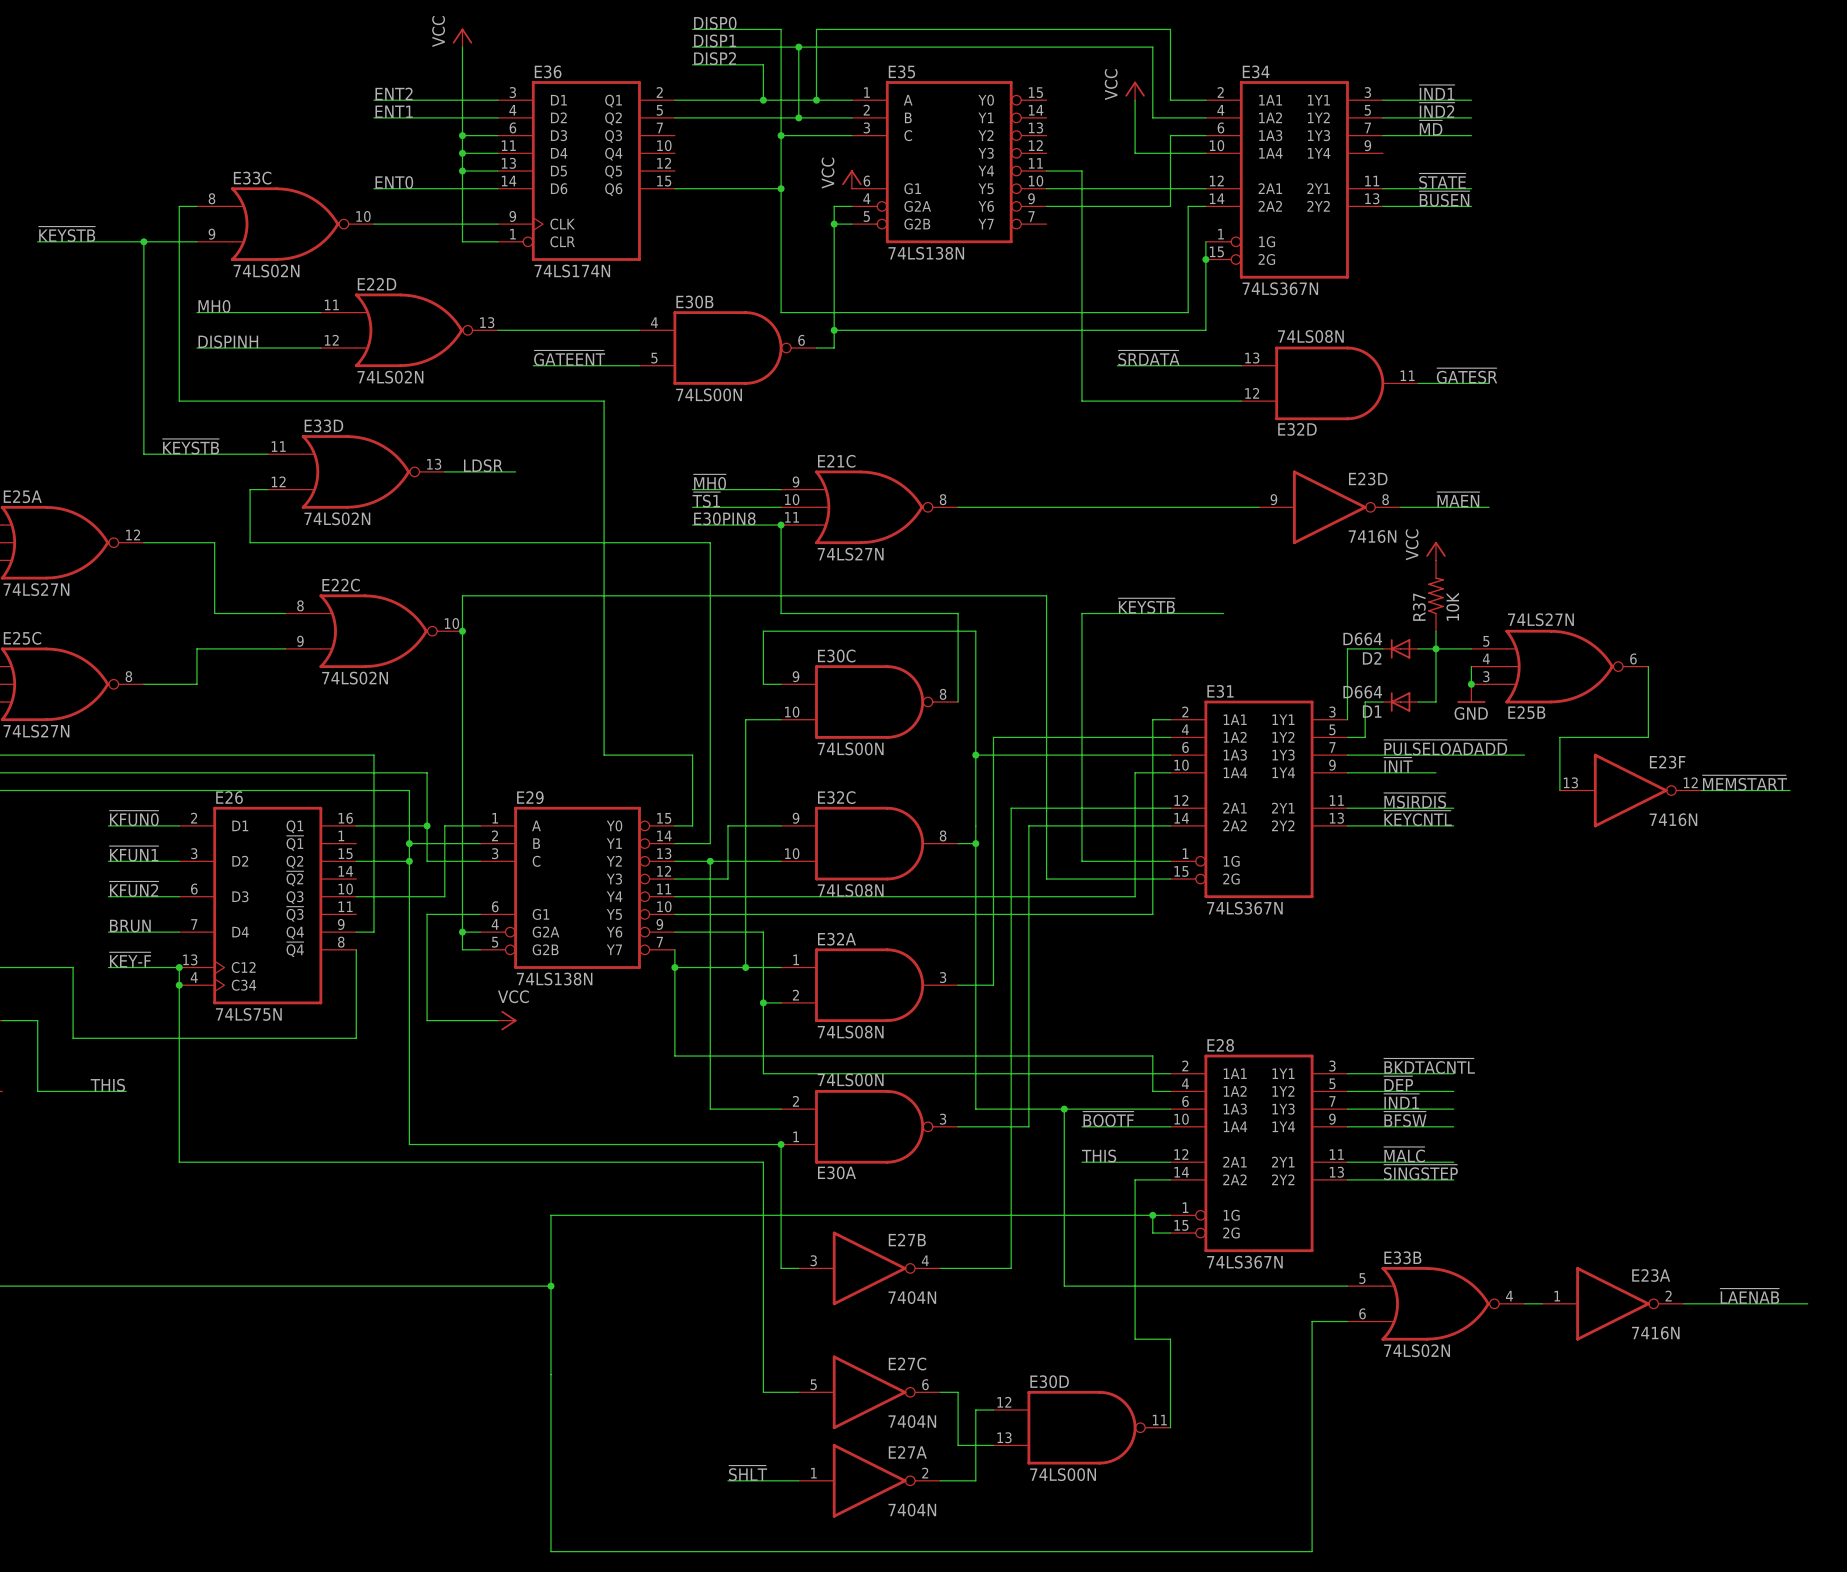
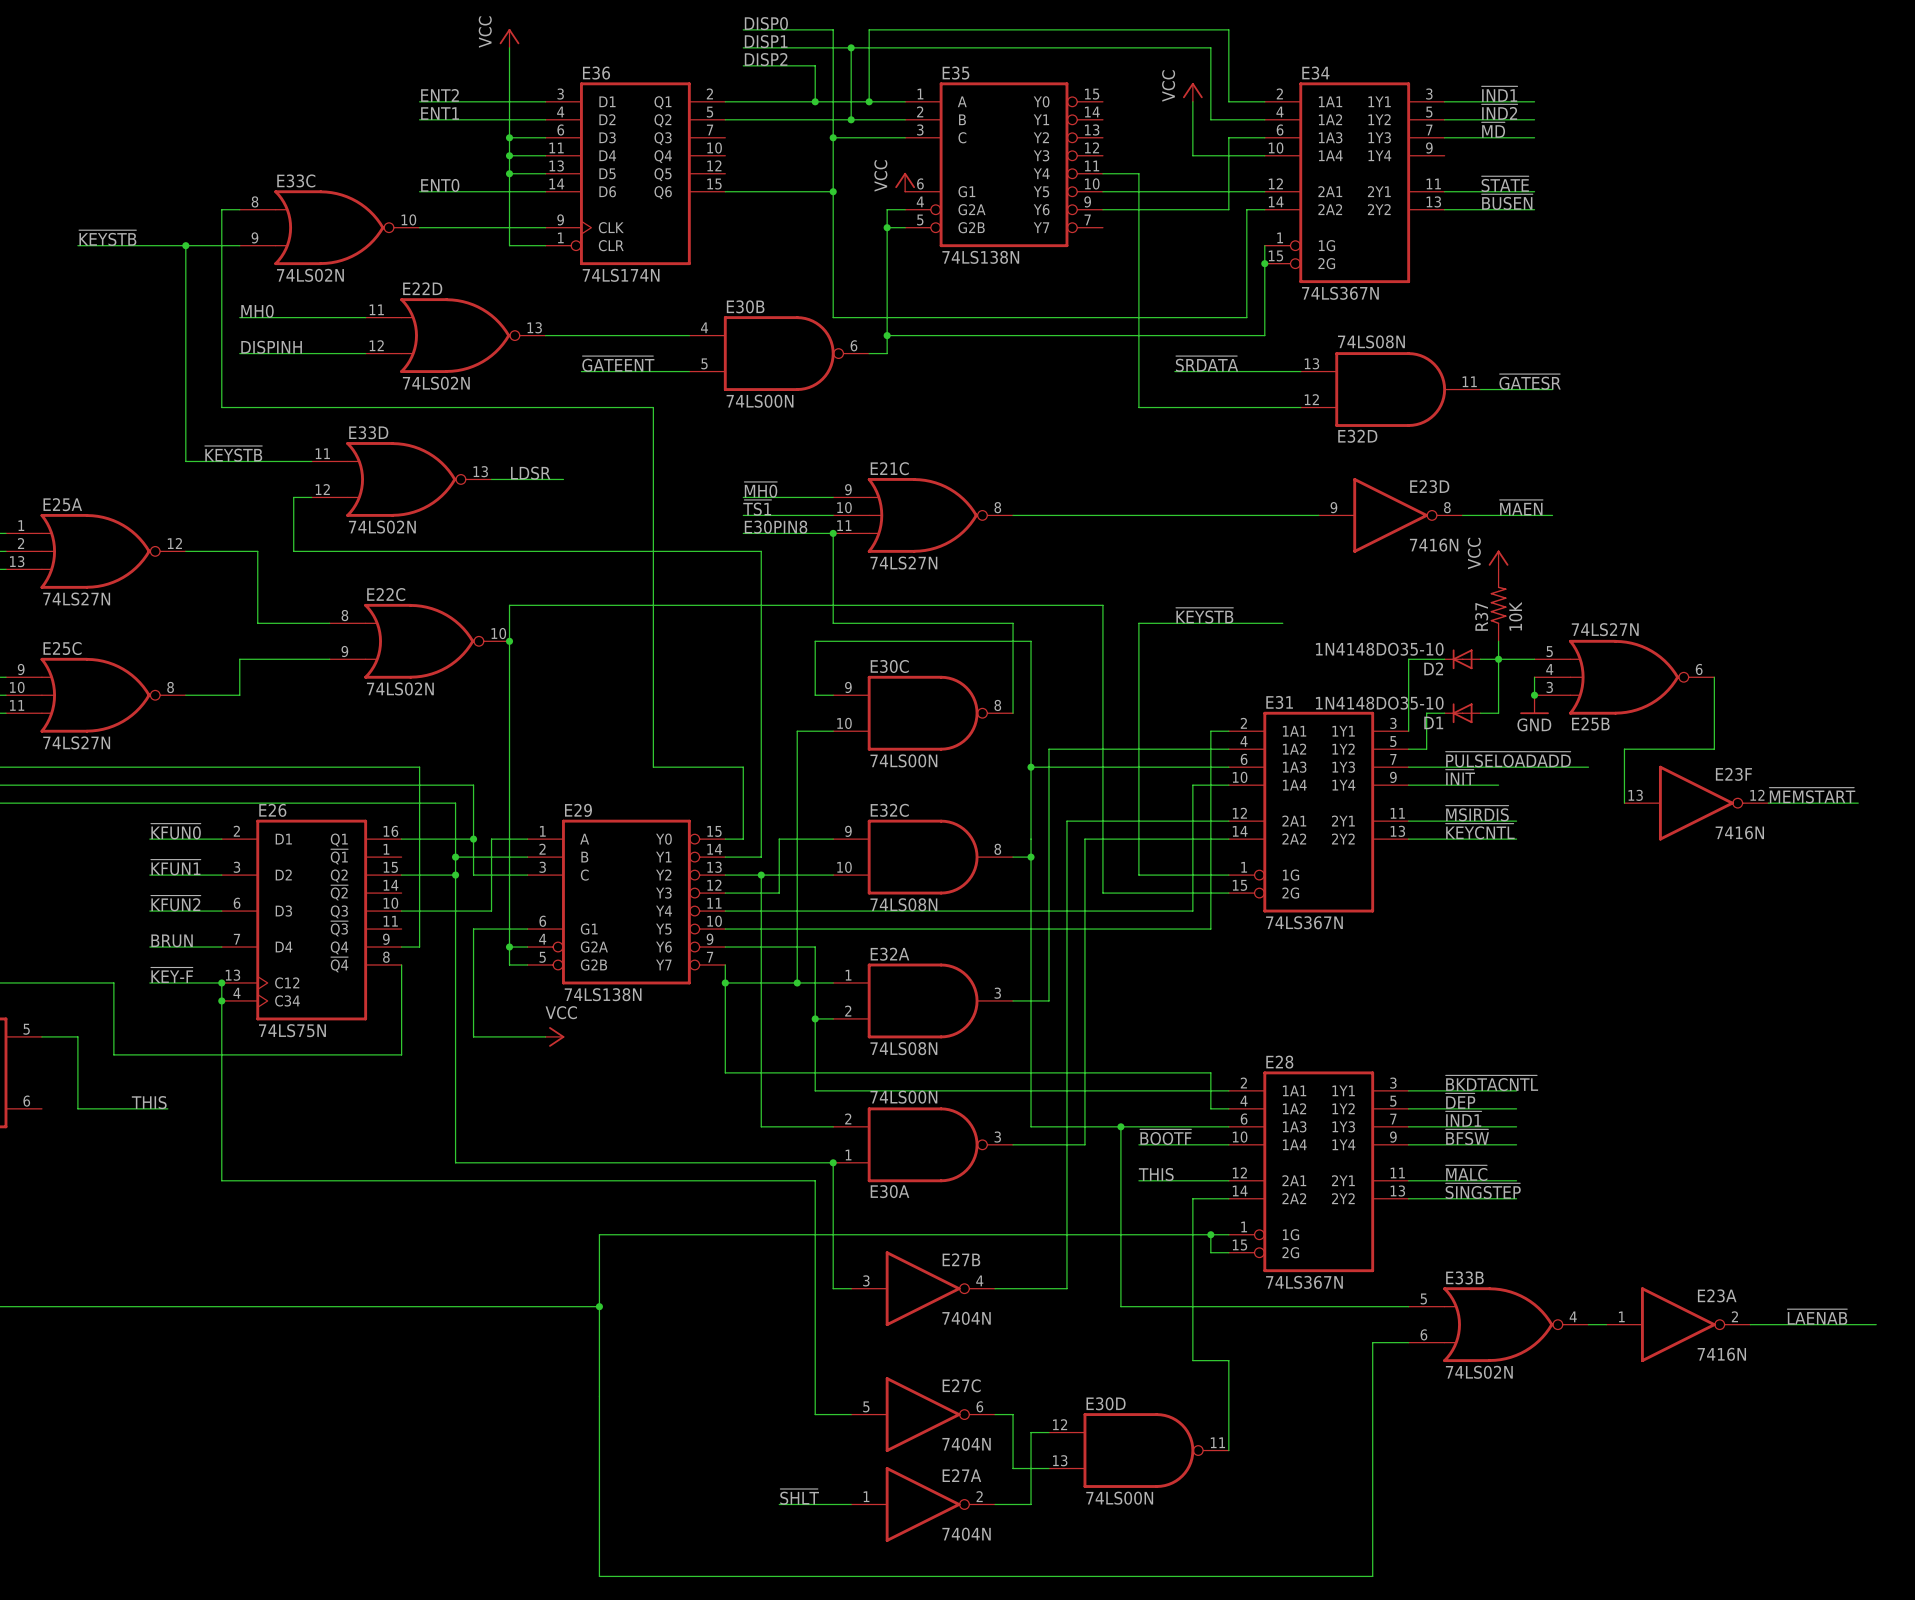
D2 value: D664 (1362, 639) -> 1N4148DO35-10 (1379, 649)
D1 value: D664 (1362, 692) -> 1N4148DO35-10 (1379, 703)

